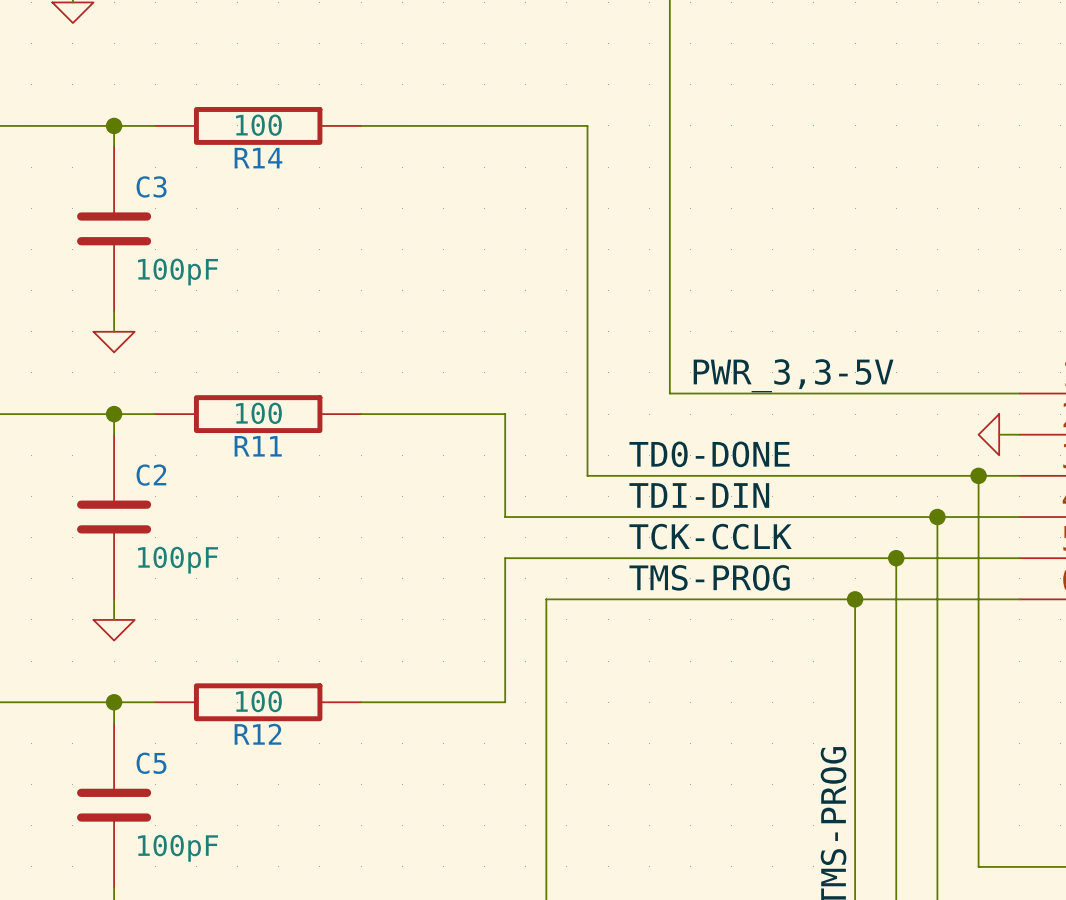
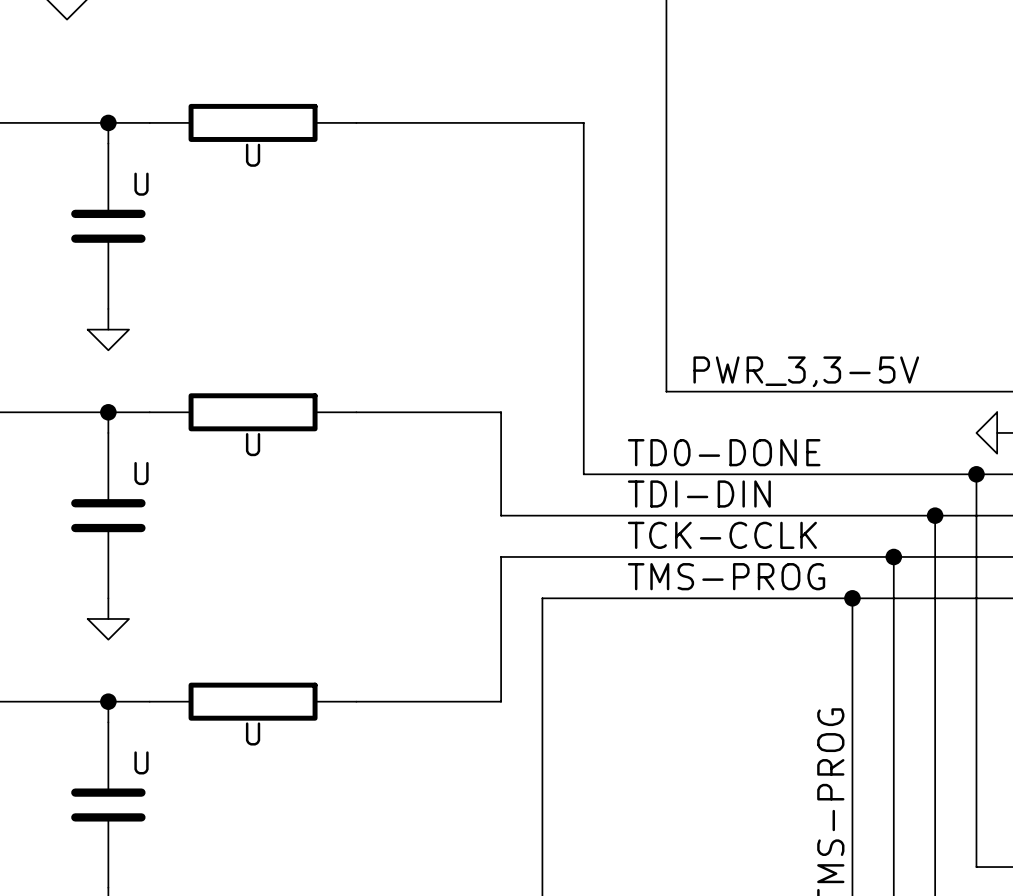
R14 value: 100 (258, 125) -> none
R14 name: R14 (258, 158) -> U (253, 155)
C3 name: C3 (151, 186) -> U (141, 184)
C3 value: 100pF (178, 272) -> none
R11 value: 100 (258, 413) -> none
R11 name: R11 (258, 446) -> U (253, 444)
C2 name: C2 (151, 475) -> U (141, 473)
C2 value: 100pF (178, 560) -> none
R12 value: 100 (258, 701) -> none
R12 name: R12 (257, 734) -> U (253, 733)
C5 name: C5 (151, 763) -> U (141, 762)
C5 value: 100pF (178, 848) -> none

